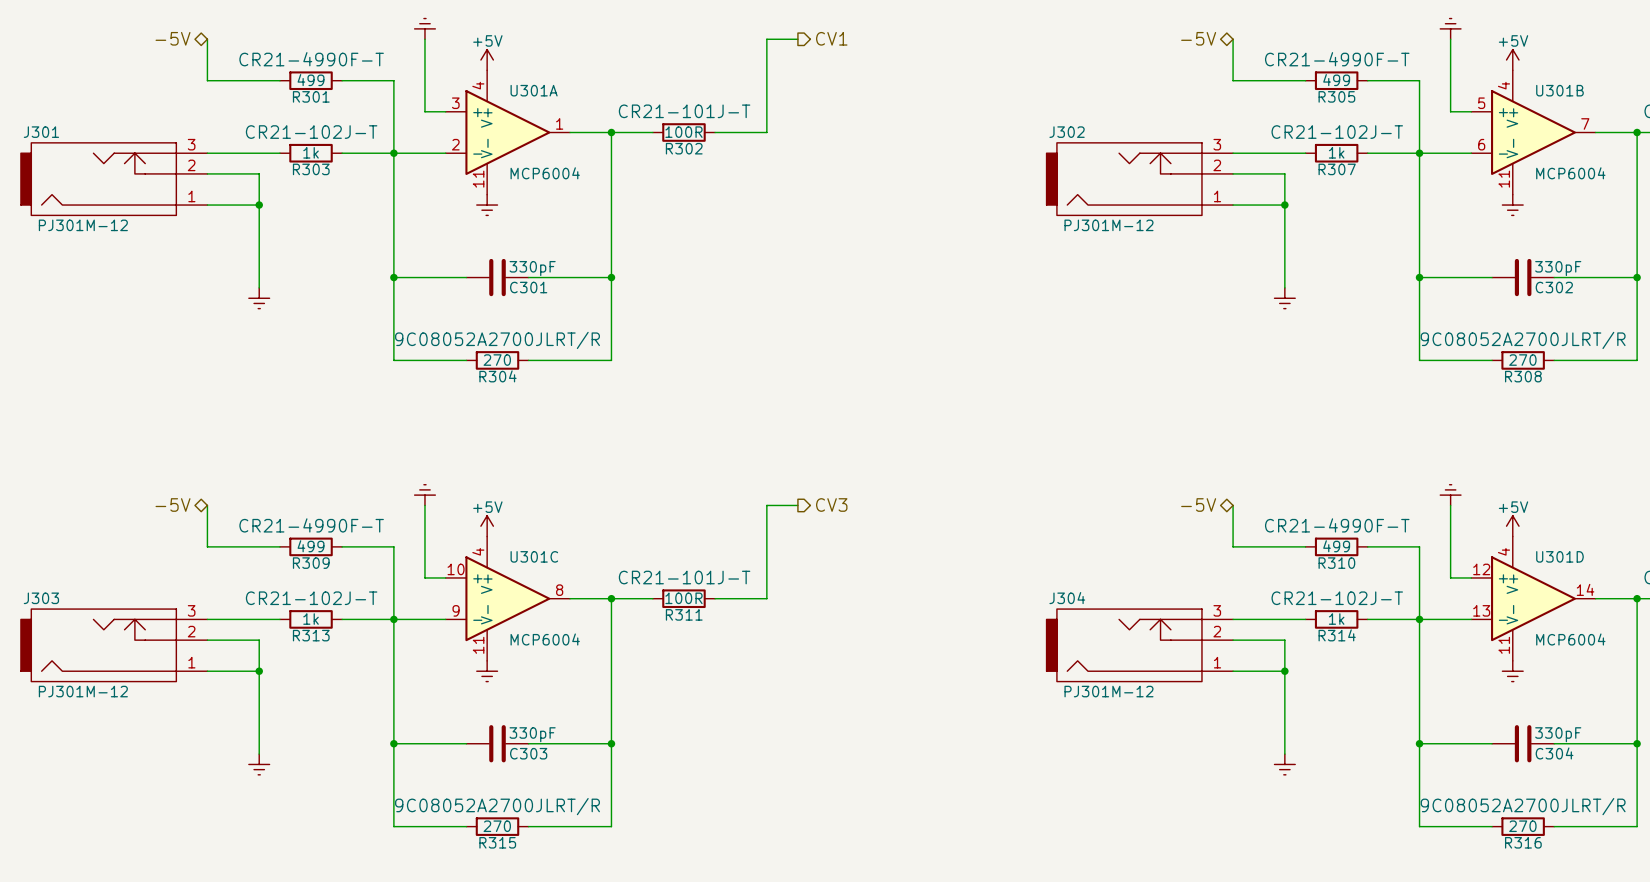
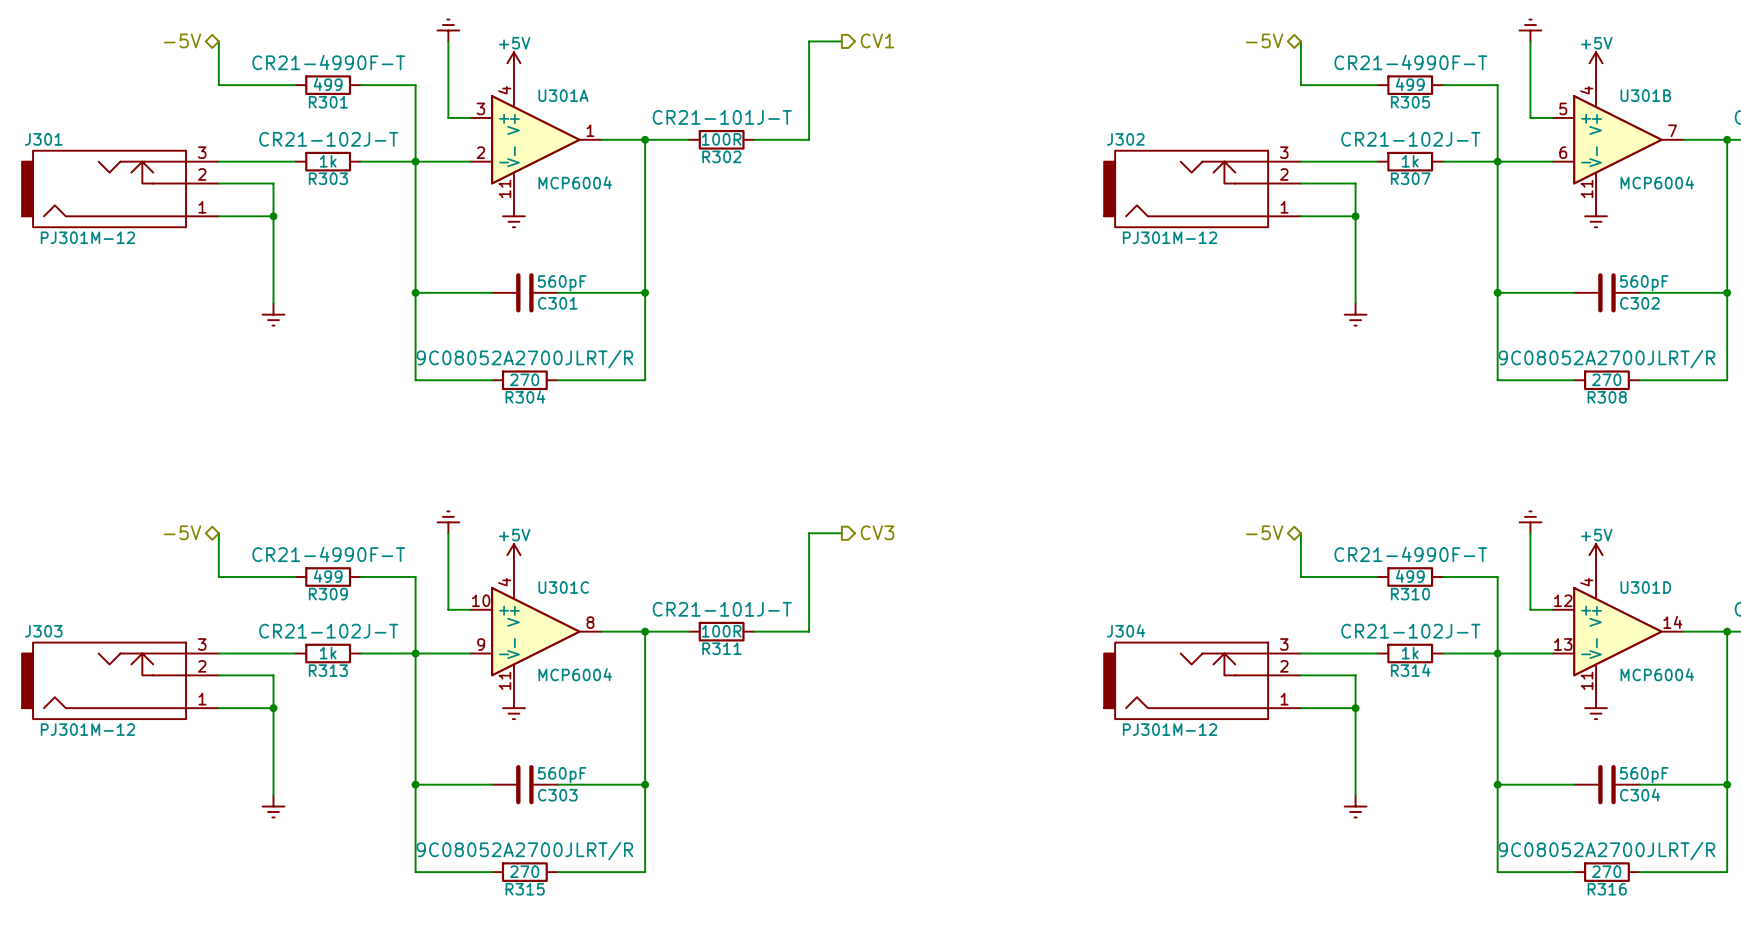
C301 value: 330pF (532, 268) -> 560pF (562, 283)
C302 value: 330pF (1558, 268) -> 560pF (1644, 283)
C303 value: 330pF (532, 734) -> 560pF (562, 775)
C304 value: 330pF (1558, 734) -> 560pF (1644, 775)

